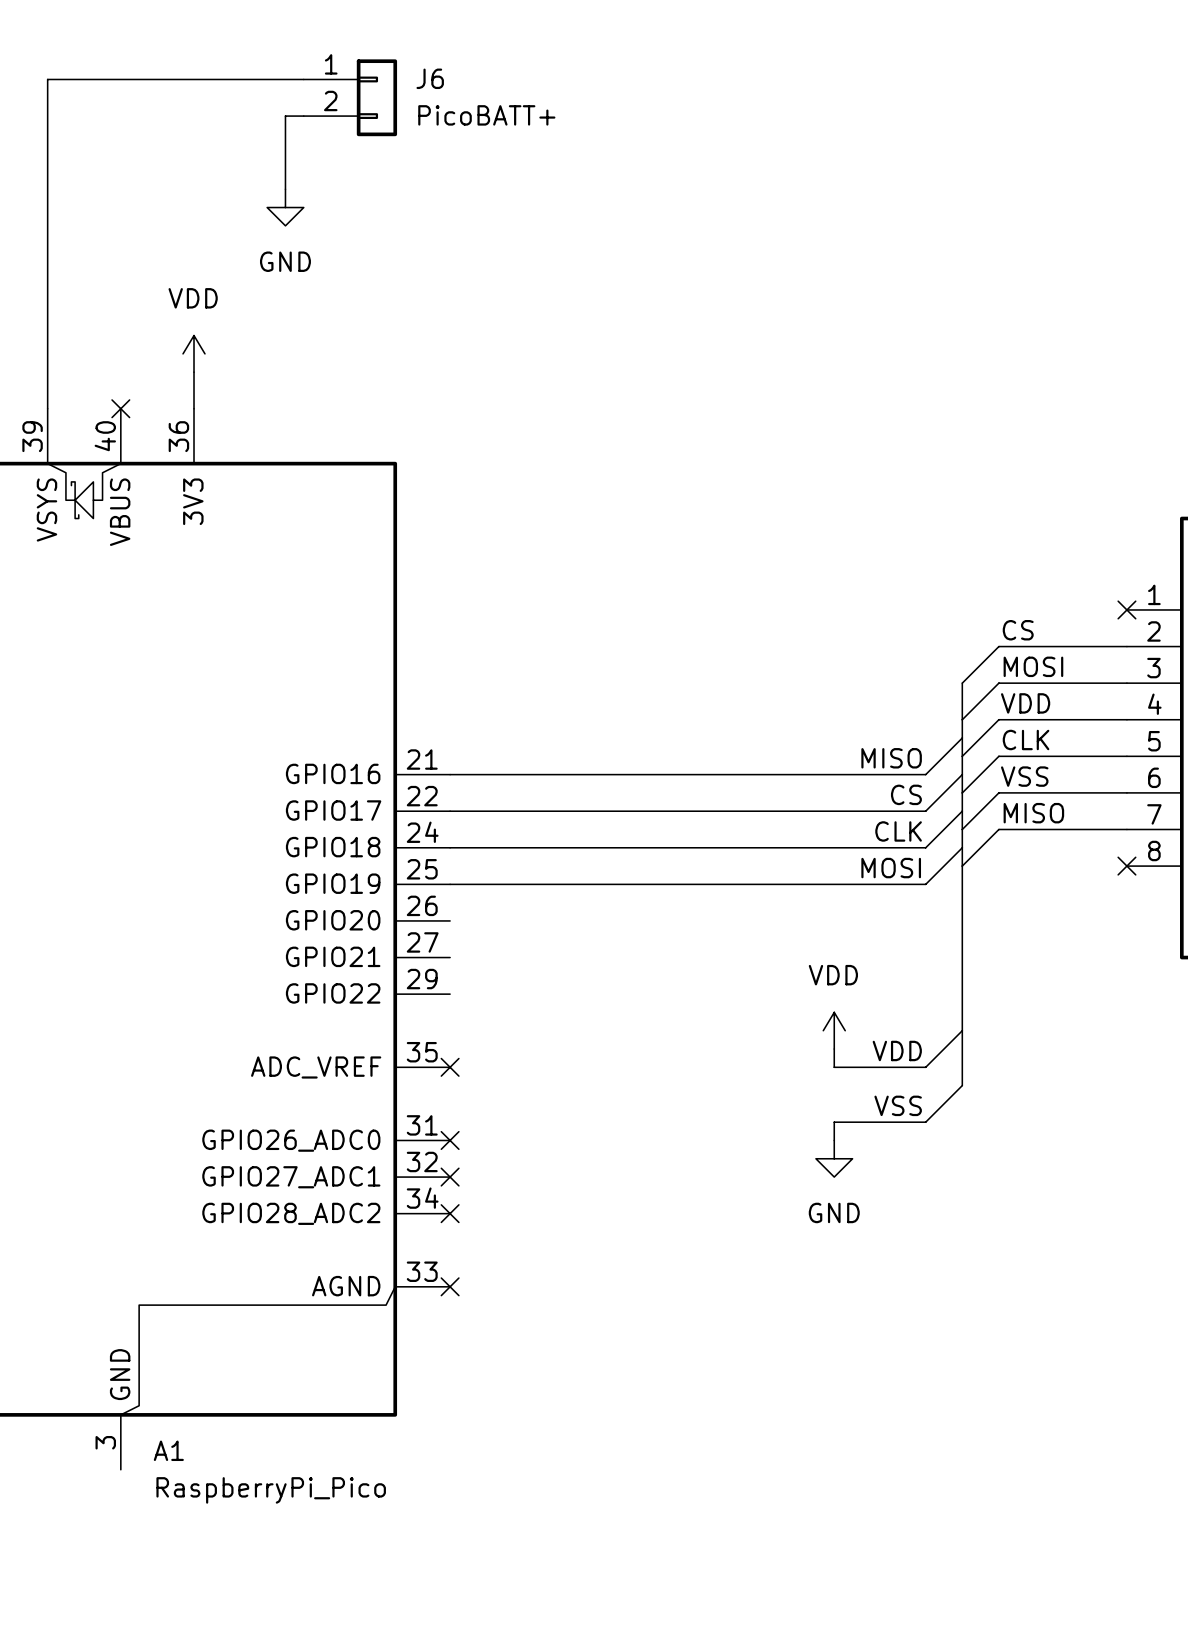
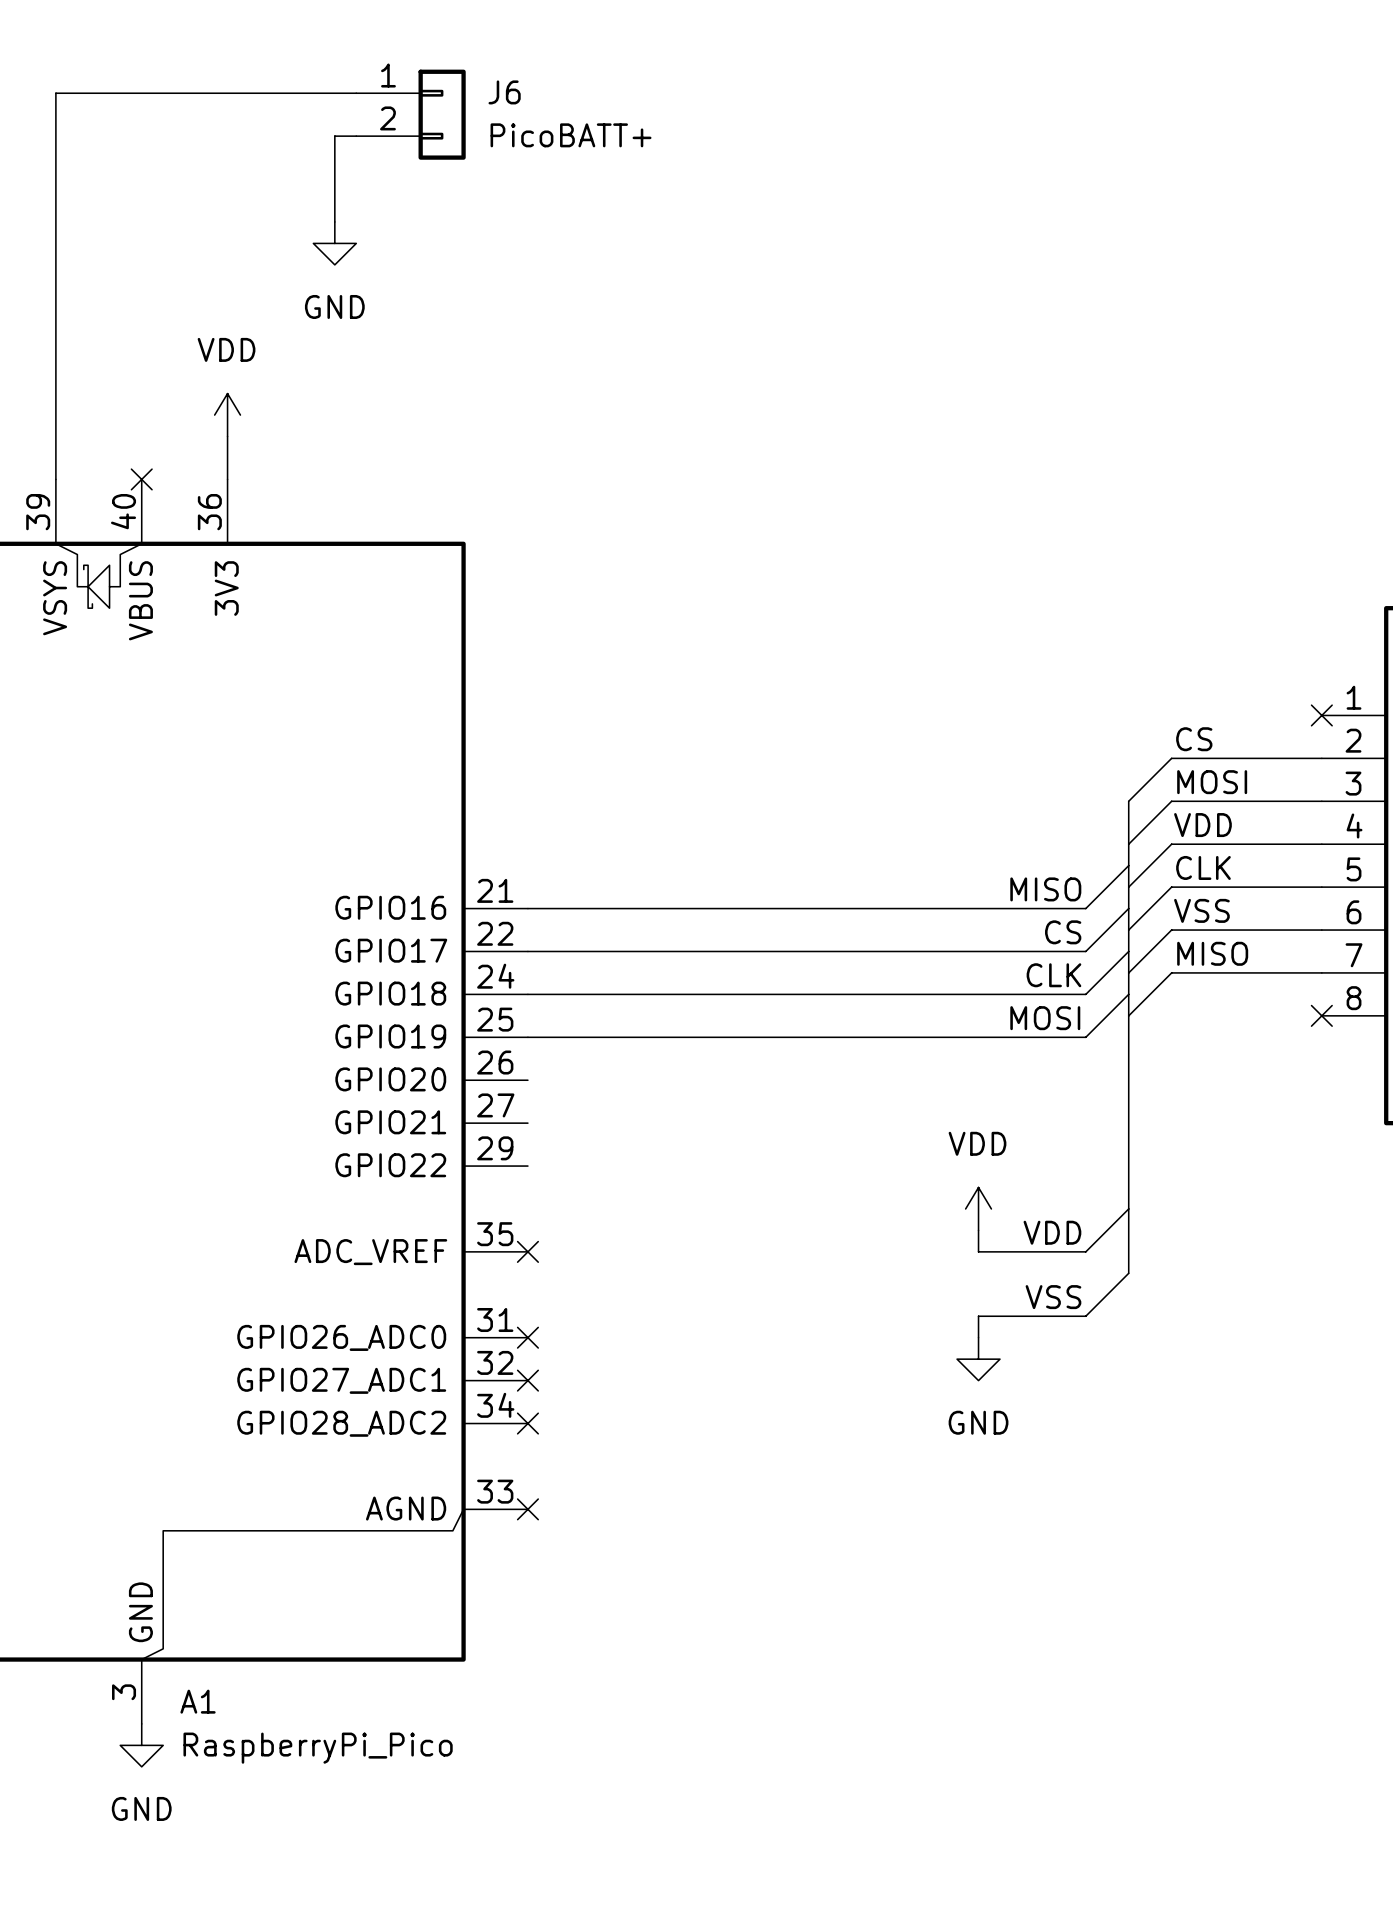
power symbol: none -> GND (141, 1745)

